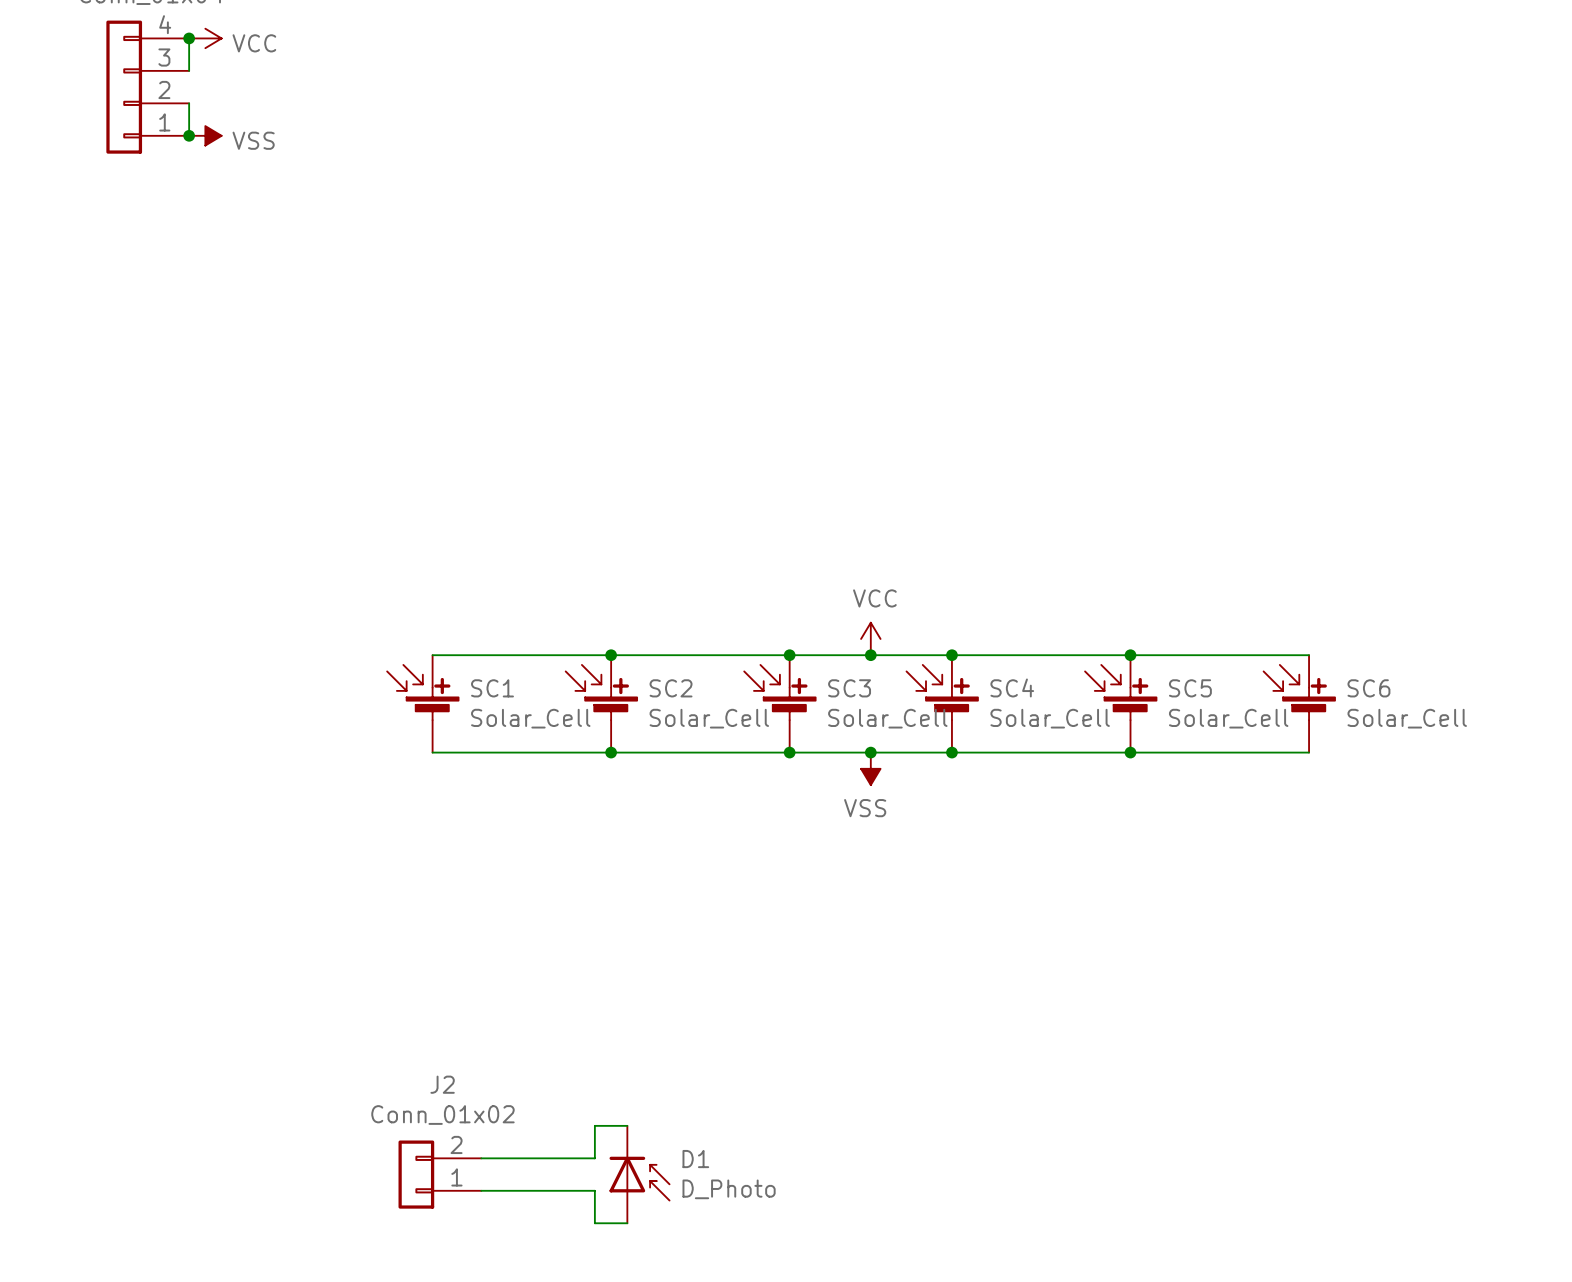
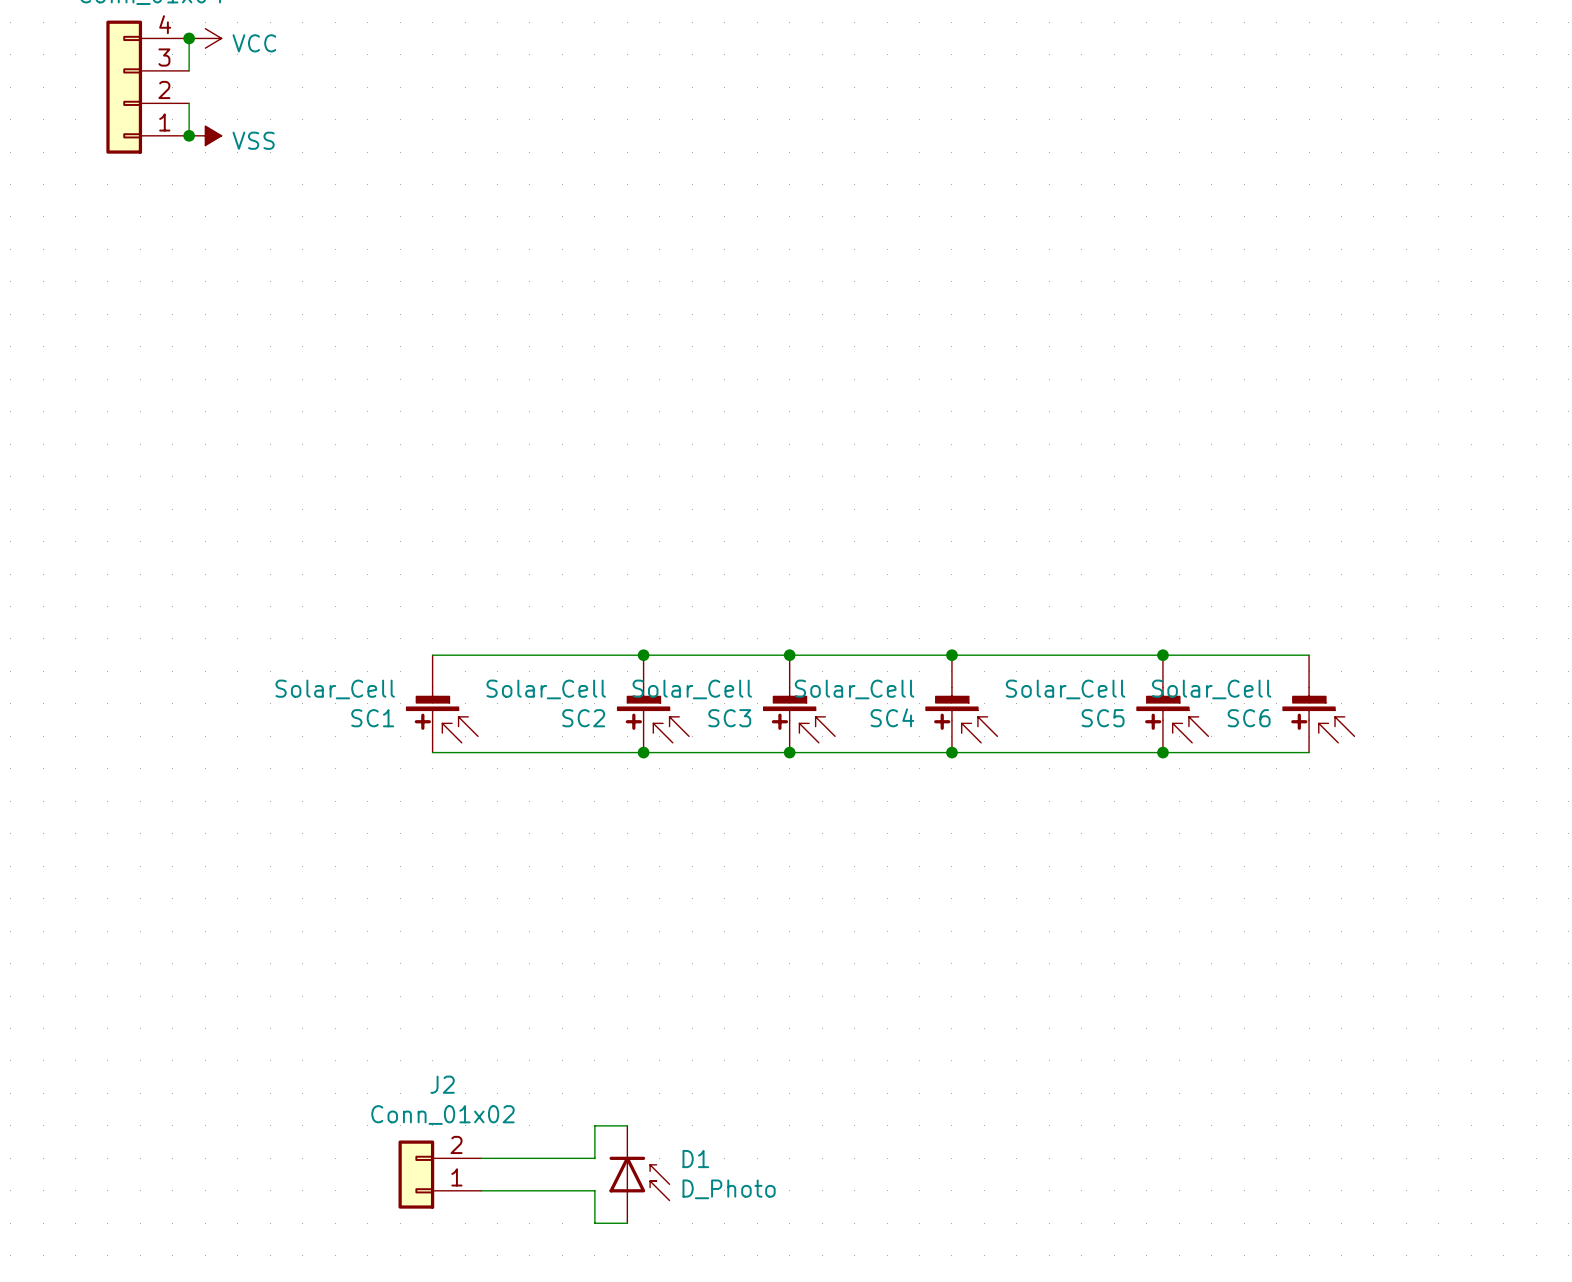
power symbol: VCC (870, 638) -> none
junction position: (611, 655) -> (643, 655)
junction: (870, 655) -> none
junction position: (1130, 655) -> (1162, 655)
SC1 rotation: 0° (422, 692) -> 180° (442, 715)
SC2 rotation: 0° (601, 692) -> 180° (653, 715)
SC3 rotation: 0° (779, 692) -> 180° (799, 715)
SC4 rotation: 0° (942, 692) -> 180° (961, 715)
SC5 rotation: 0° (1120, 692) -> 180° (1172, 715)
SC6 rotation: 0° (1299, 692) -> 180° (1318, 715)
junction position: (611, 752) -> (643, 752)
junction: (870, 752) -> none
junction position: (1130, 752) -> (1162, 752)
power symbol: VSS (870, 768) -> none

